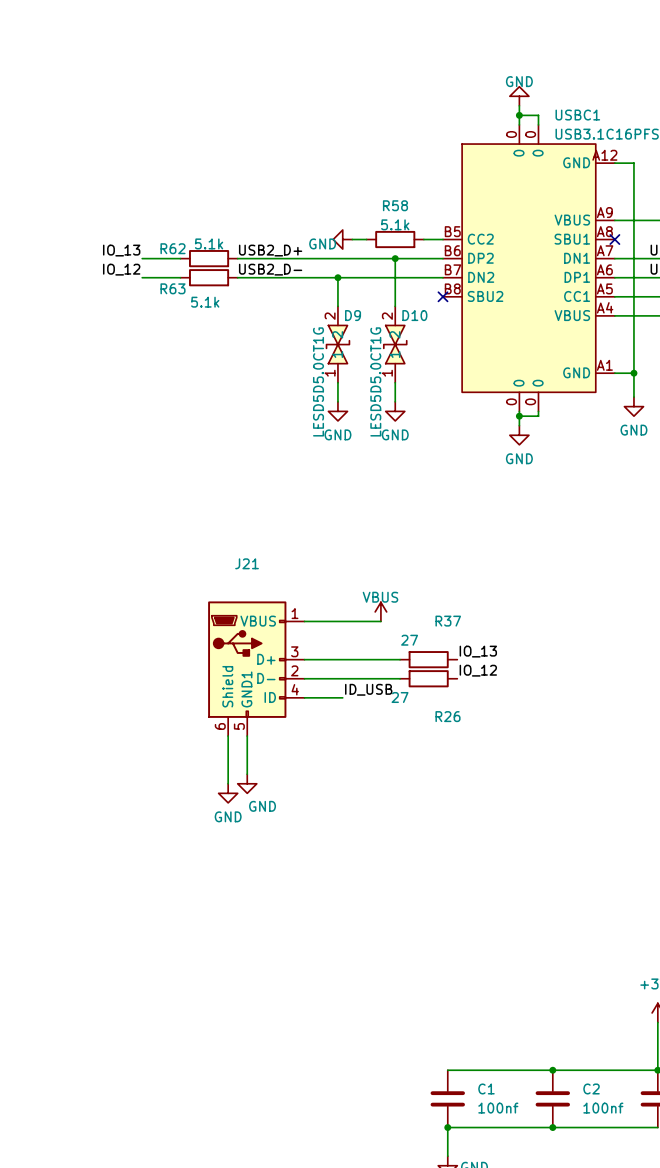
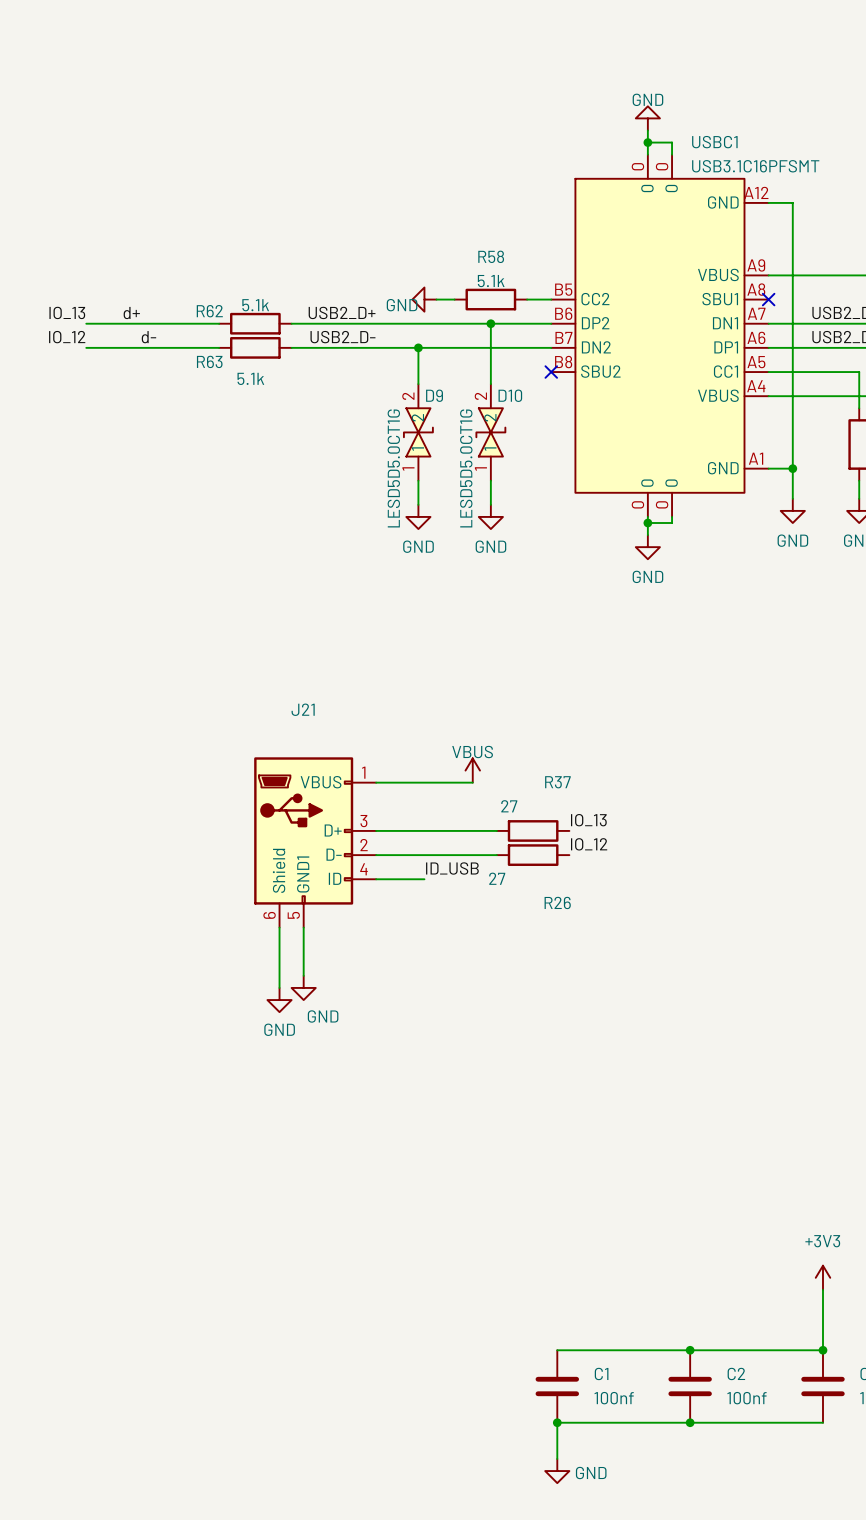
label: none -> d+ (131, 313)
label position: IO_13 (121, 250) -> IO_13 (67, 312)
wire: none -> (86, 323) (170, 323)
label position: IO_12 (121, 269) -> IO_12 (67, 337)
label: none -> d- (148, 337)
wire: none -> (86, 347) (170, 347)

